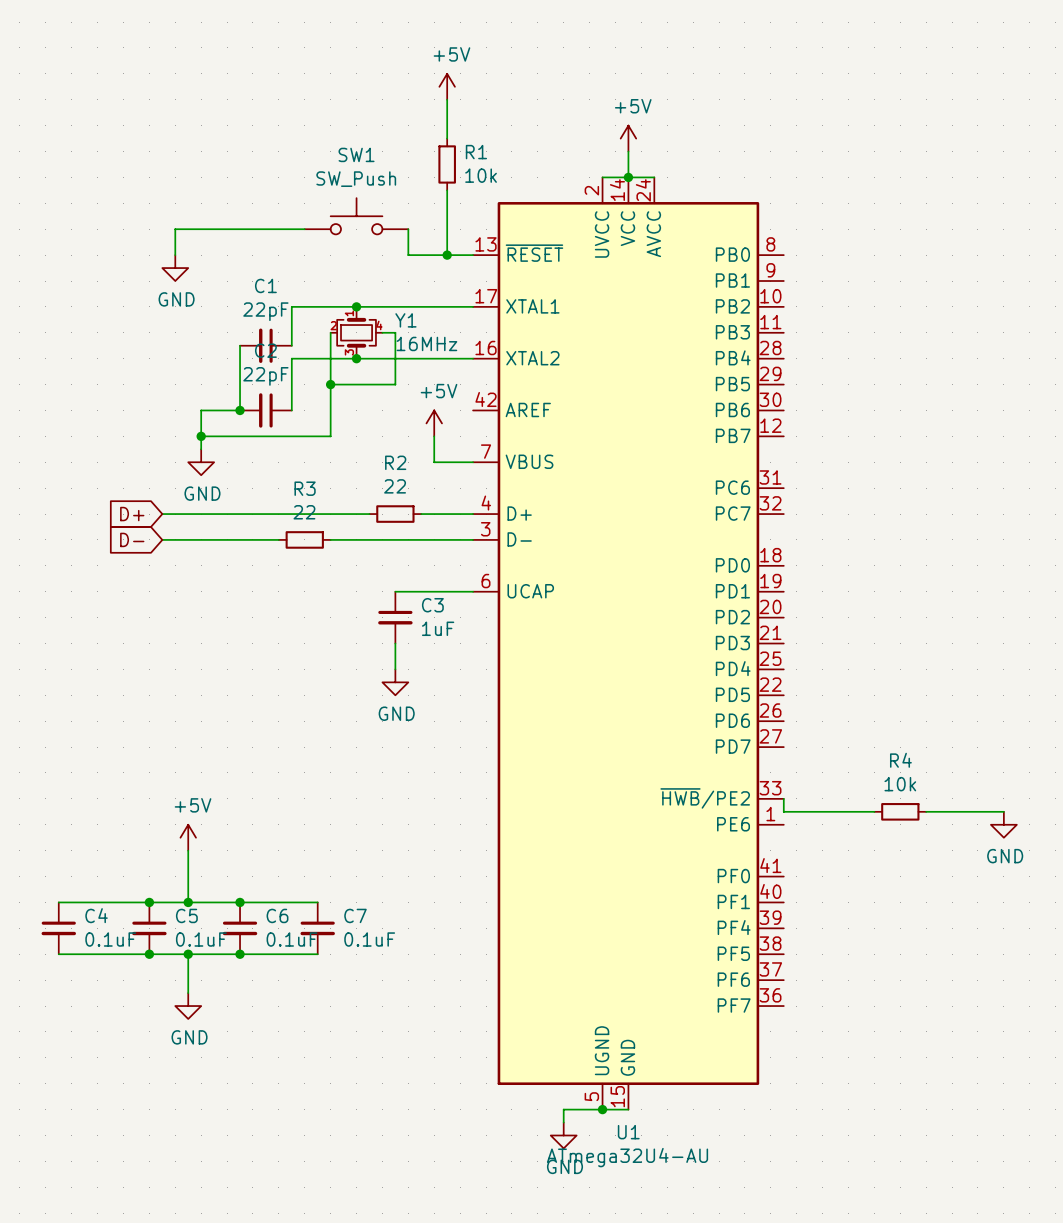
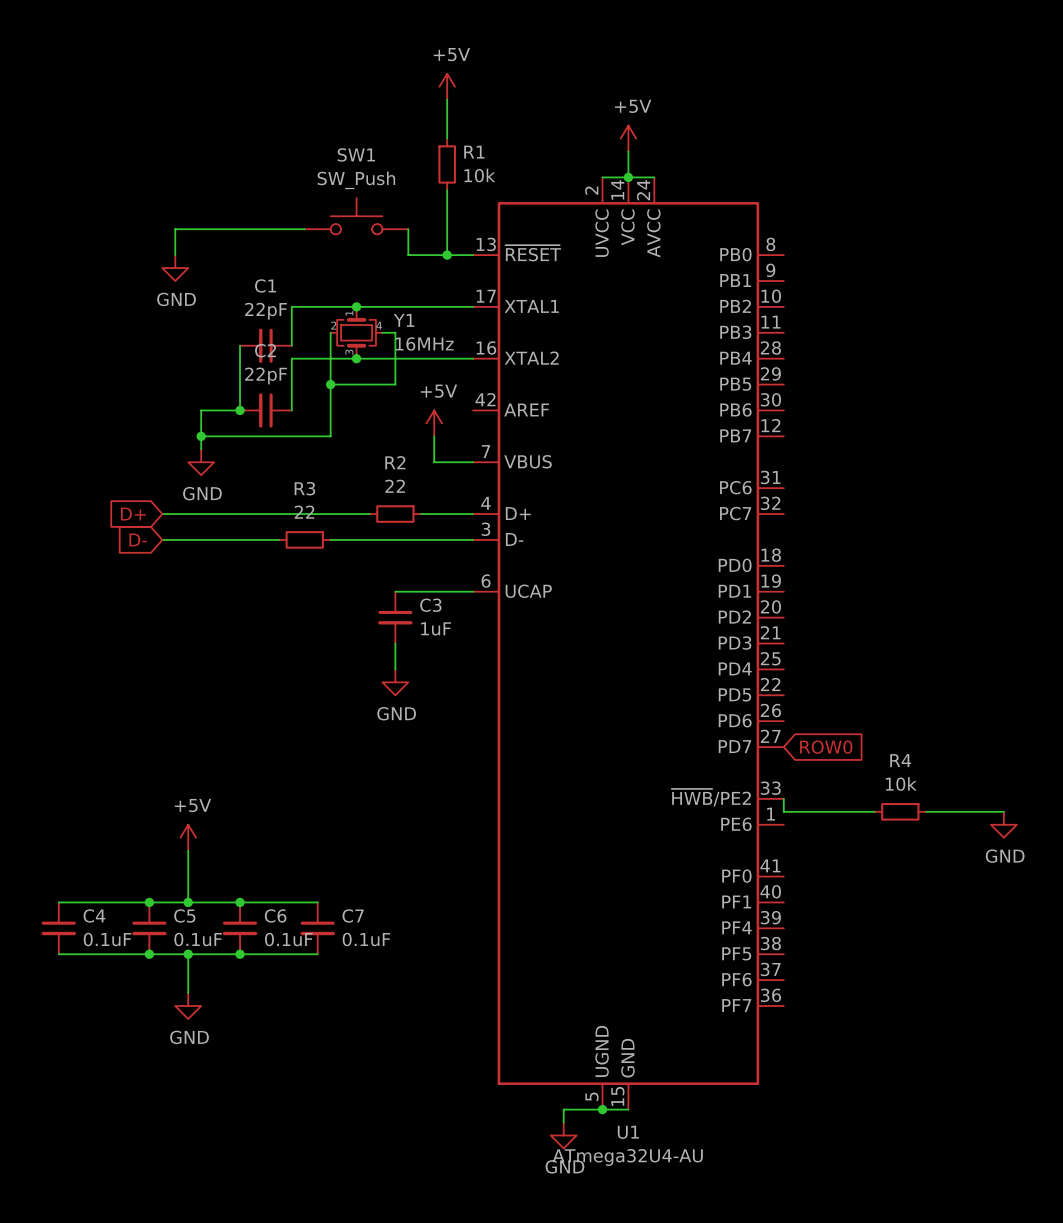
global label: none -> ROW0 (826, 747)

